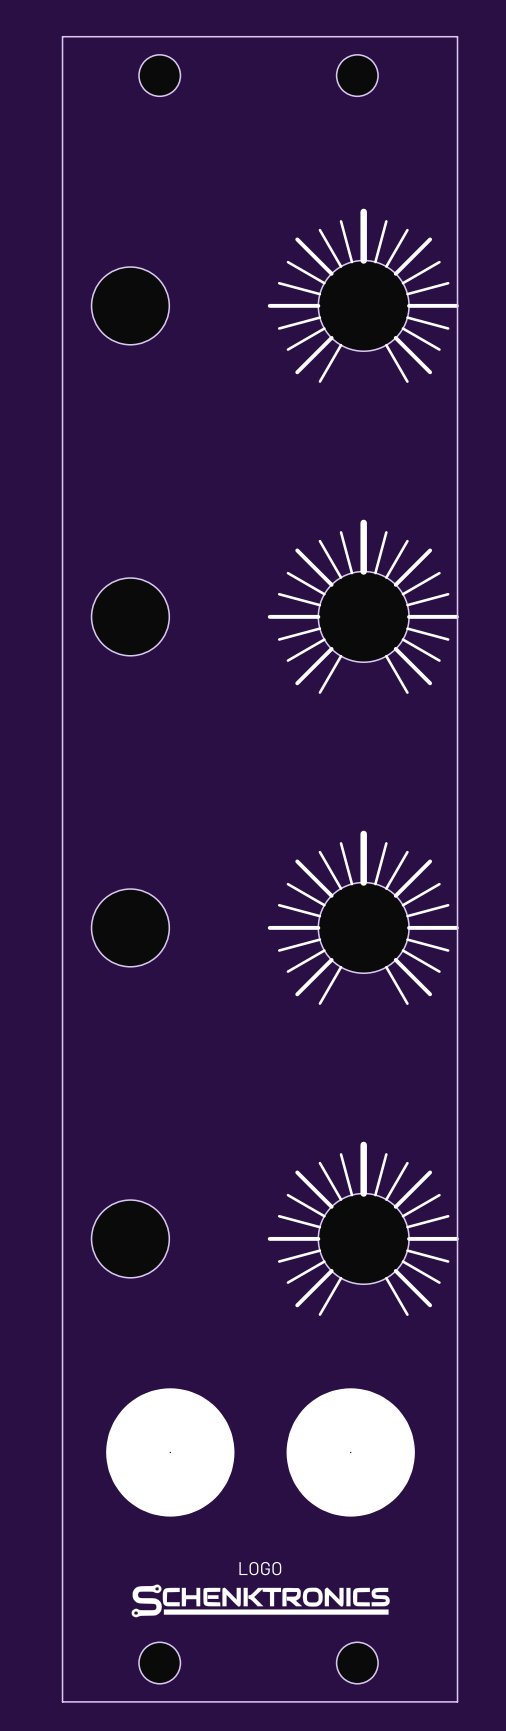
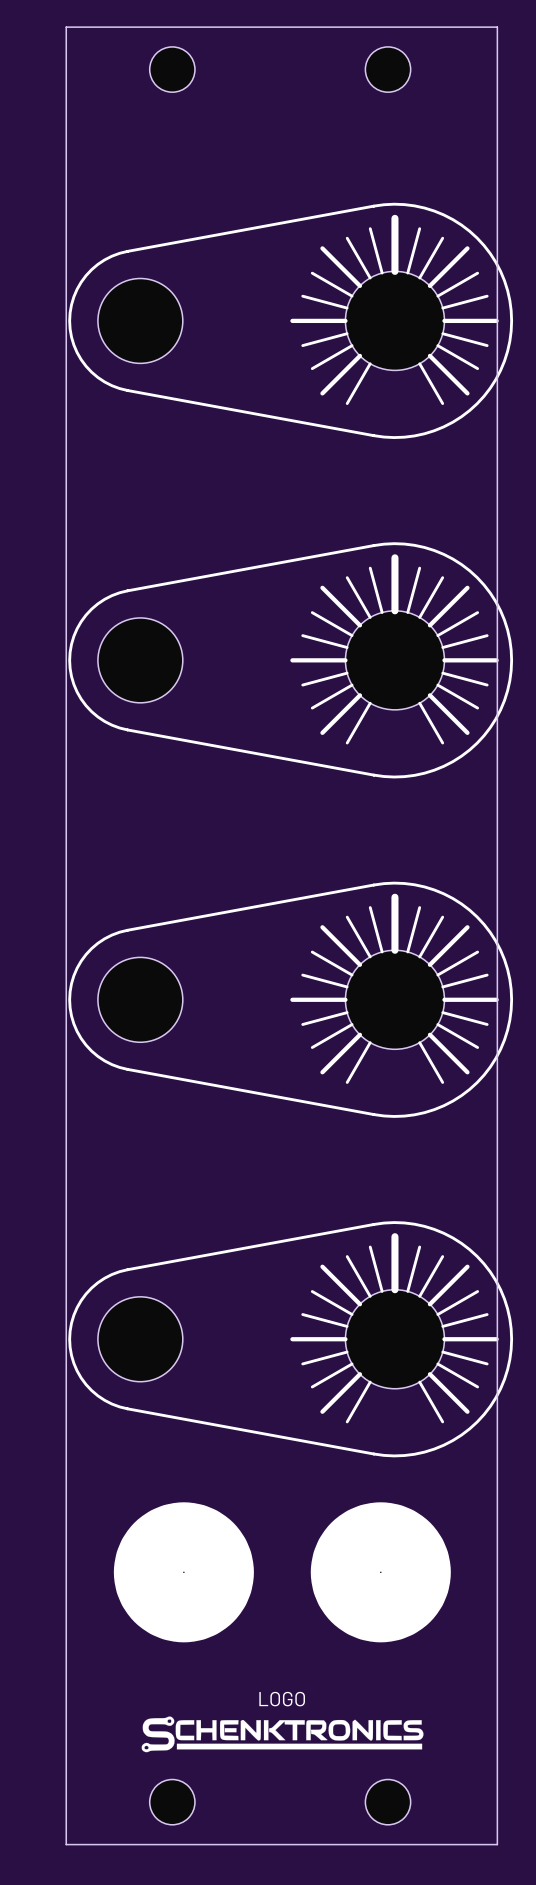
line: none -> (373, 206) (127, 251) (111, 256) (97, 264) (86, 275) (73, 296) (70, 312) (70, 329) (77, 352) (86, 366) (97, 377) (111, 385) (127, 390) (384, 437) (414, 435) (443, 426) (461, 416) (477, 403) (490, 388) (504, 360) (509, 341) (511, 320) (509, 300) (504, 280) (495, 262) (484, 245) (469, 231) (452, 219) (434, 211) (414, 205) (394, 204) (373, 206)
line: none -> (373, 545) (127, 590) (111, 595) (91, 609) (81, 621) (73, 636) (69, 660) (71, 676) (77, 691) (86, 705) (97, 716) (111, 725) (127, 729) (384, 776) (414, 775) (443, 766) (461, 756) (477, 743) (490, 727) (500, 709) (507, 690) (511, 670) (511, 650) (507, 630) (500, 610) (490, 593) (469, 570) (452, 559) (434, 550) (414, 545) (394, 543) (373, 545)
line: none -> (373, 885) (127, 930) (111, 935) (91, 948) (81, 961) (73, 975) (70, 991) (70, 1008) (77, 1031) (86, 1045) (97, 1056) (111, 1064) (127, 1069) (384, 1115) (414, 1114) (443, 1105) (461, 1095) (477, 1082) (490, 1066) (500, 1049) (507, 1030) (511, 1009) (511, 989) (507, 969) (500, 950) (490, 932) (477, 917) (452, 898) (434, 889) (414, 884) (394, 883) (373, 885)
line: none -> (373, 1224) (127, 1269) (111, 1274) (91, 1288) (81, 1300) (73, 1315) (70, 1331) (70, 1347) (77, 1370) (86, 1384) (97, 1395) (111, 1404) (127, 1408) (384, 1455) (414, 1454) (443, 1445) (461, 1435) (477, 1421) (490, 1406) (500, 1388) (507, 1369) (511, 1349) (511, 1329) (507, 1308) (495, 1280) (484, 1263) (469, 1249) (452, 1237) (434, 1229) (414, 1224) (394, 1222) (373, 1224)

